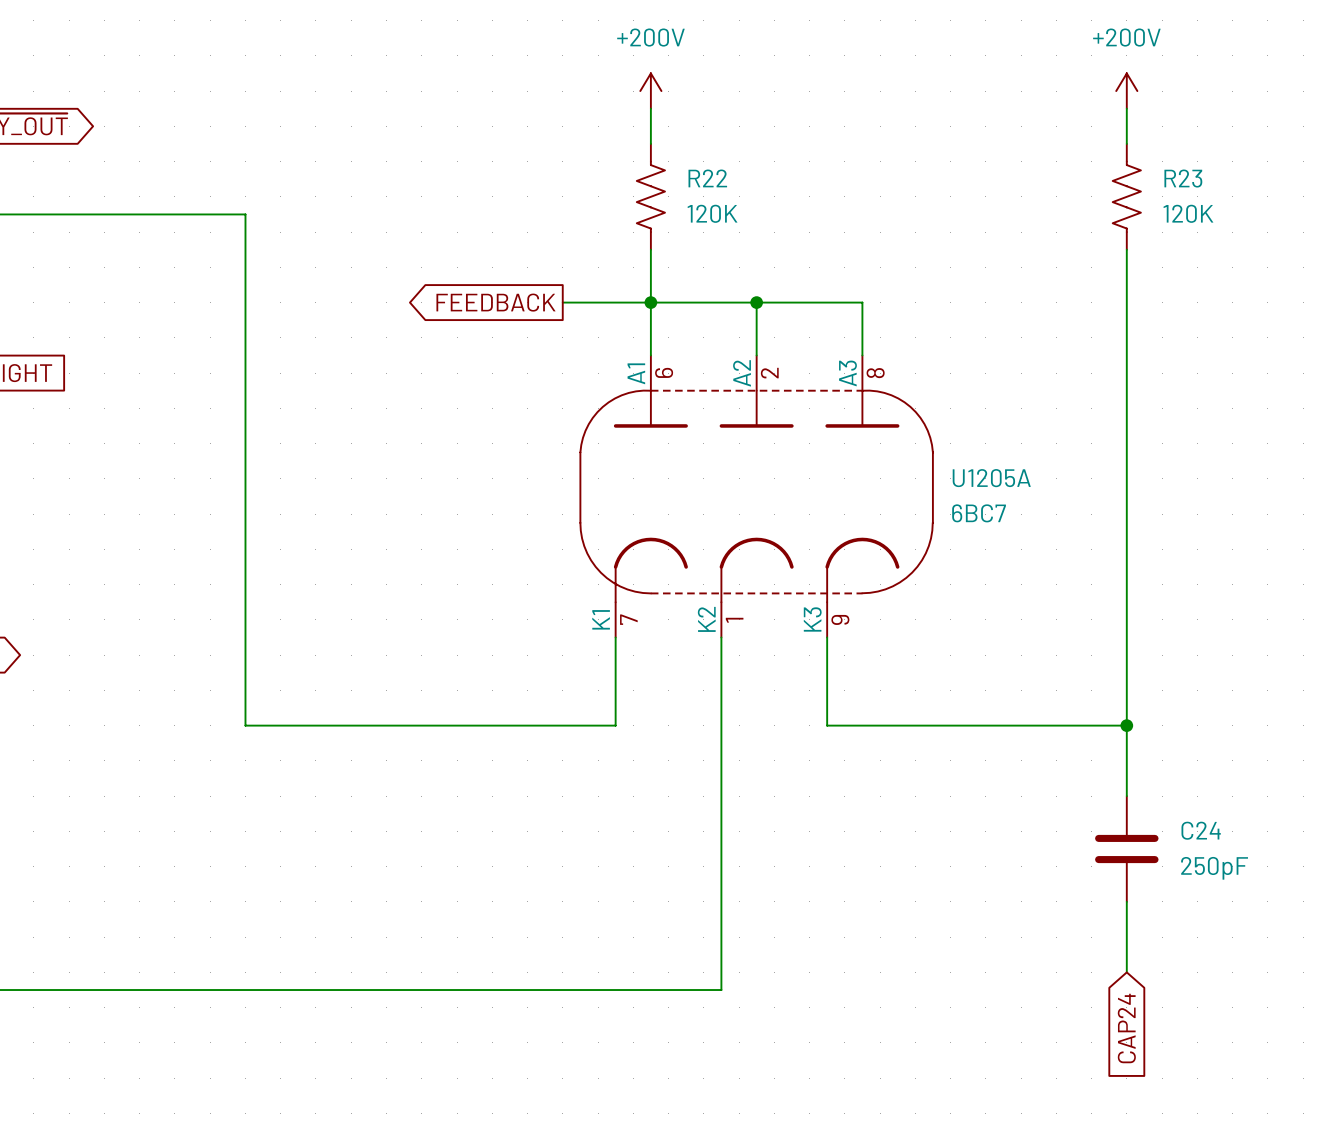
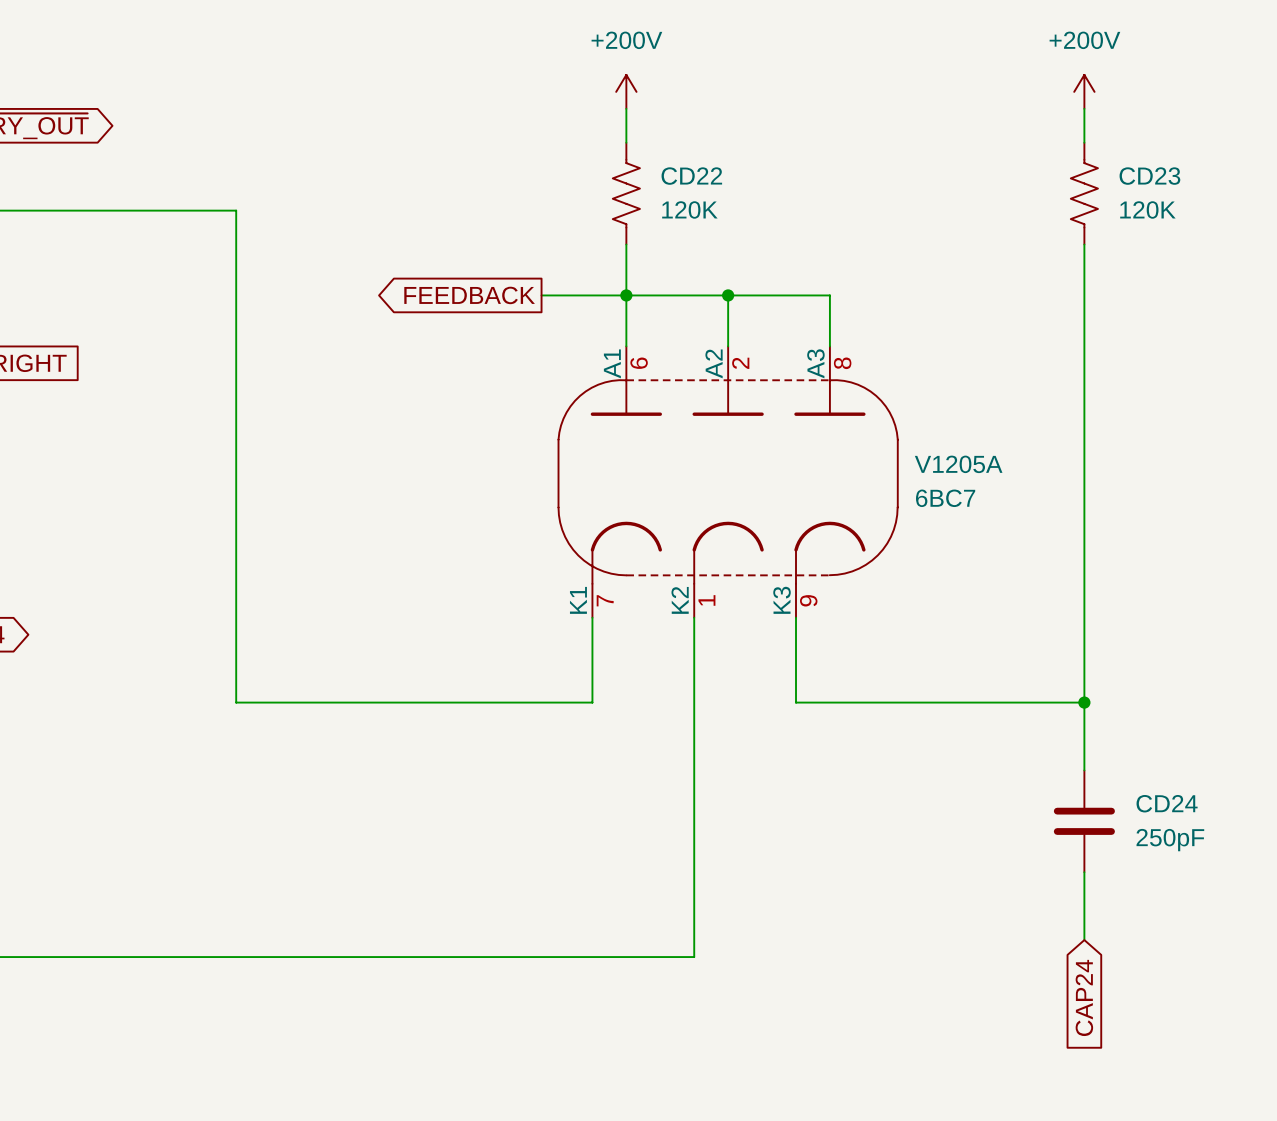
R22 name: R22 (707, 178) -> CD22 (691, 176)
R23 name: R23 (1183, 178) -> CD23 (1149, 176)
U1205A name: U1205A (991, 478) -> V1205A (958, 464)
C24 name: C24 (1201, 830) -> CD24 (1167, 803)

